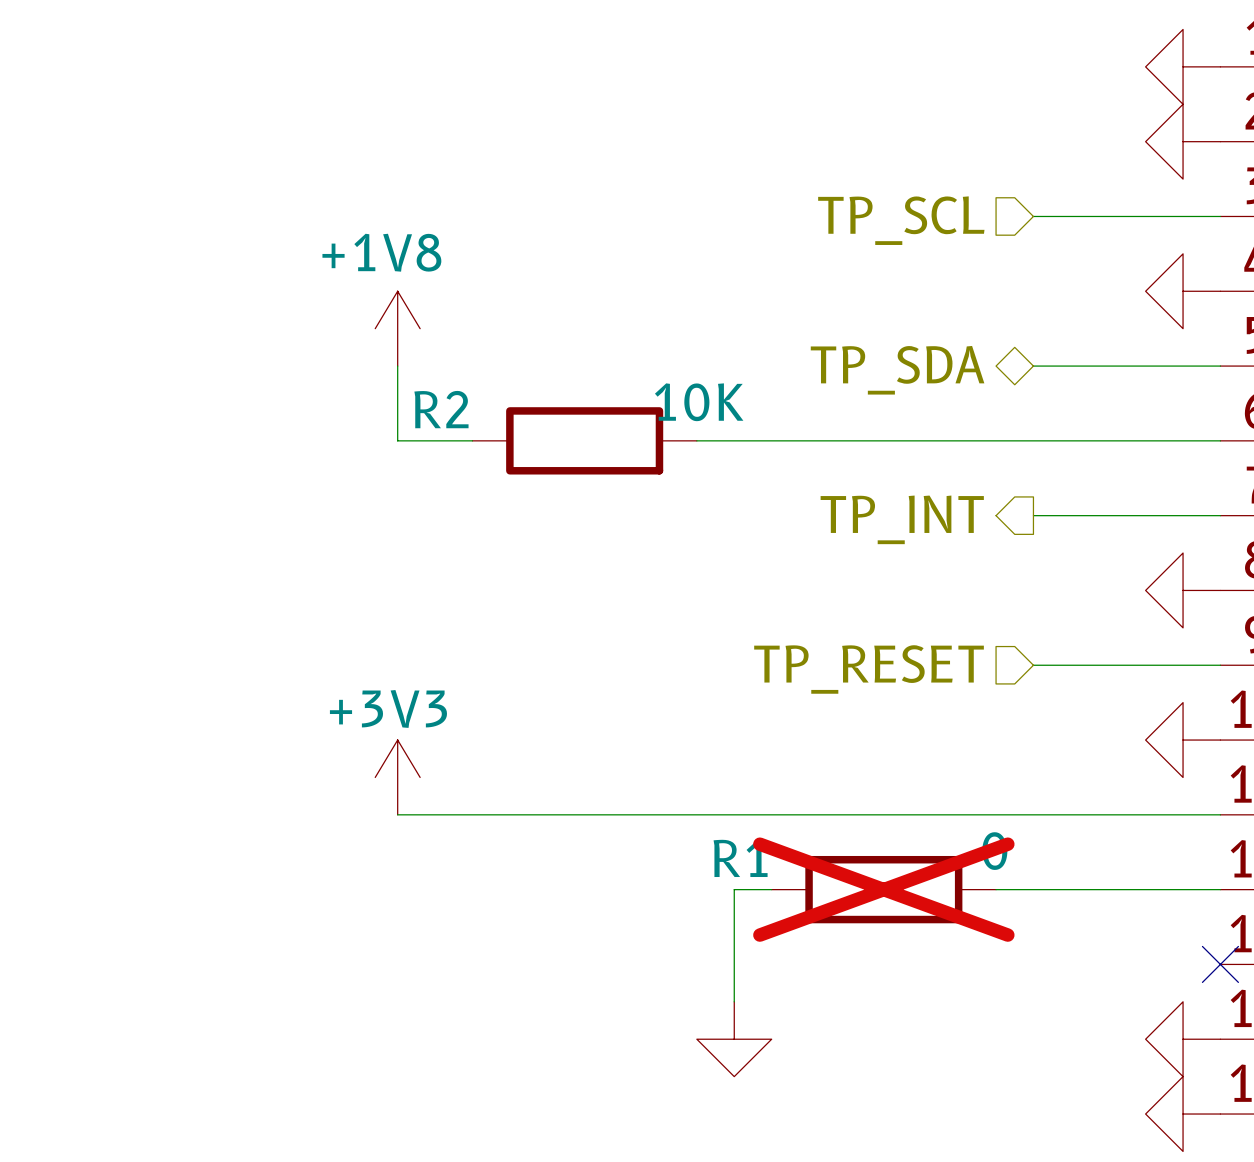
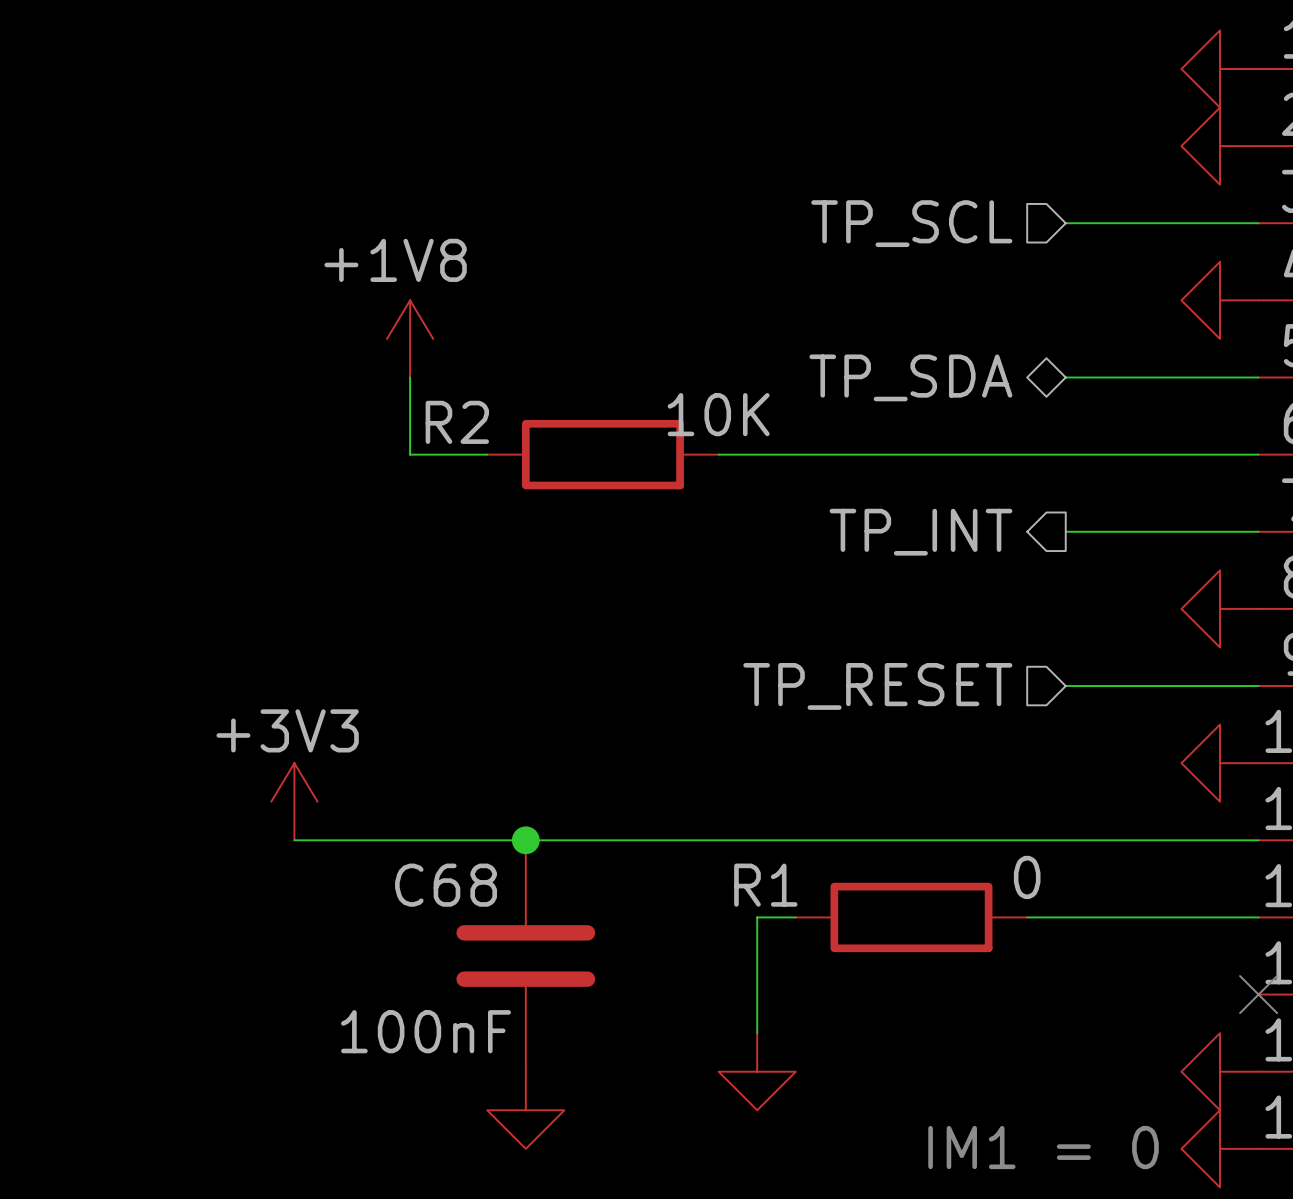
power symbol position: +3V3 (397, 777) -> +3V3 (294, 801)
wire: none -> (294, 840) (410, 840)
junction: none -> (525, 840)
R1 do-not-place cross: (883, 889) -> none
C68: none -> 100nF (525, 956)
power symbol: none -> (525, 1110)
text: none -> IM1 = 0 (1043, 1147)

